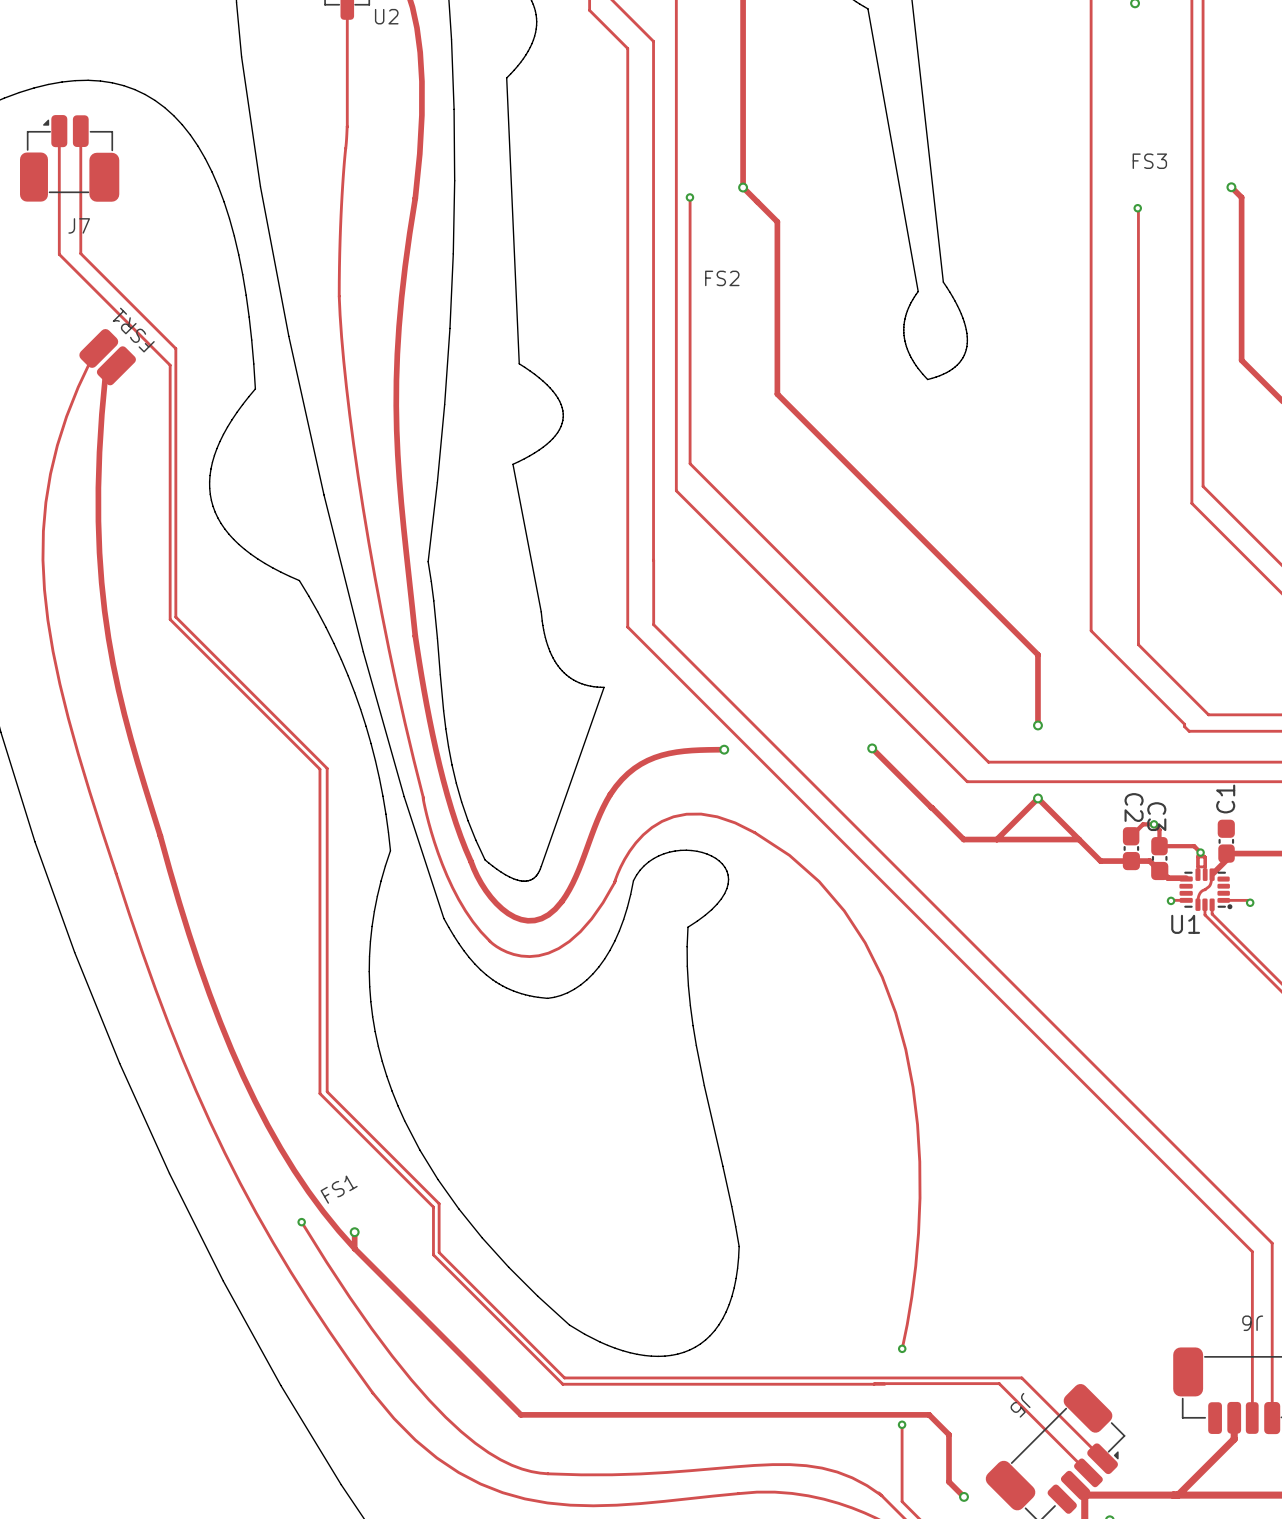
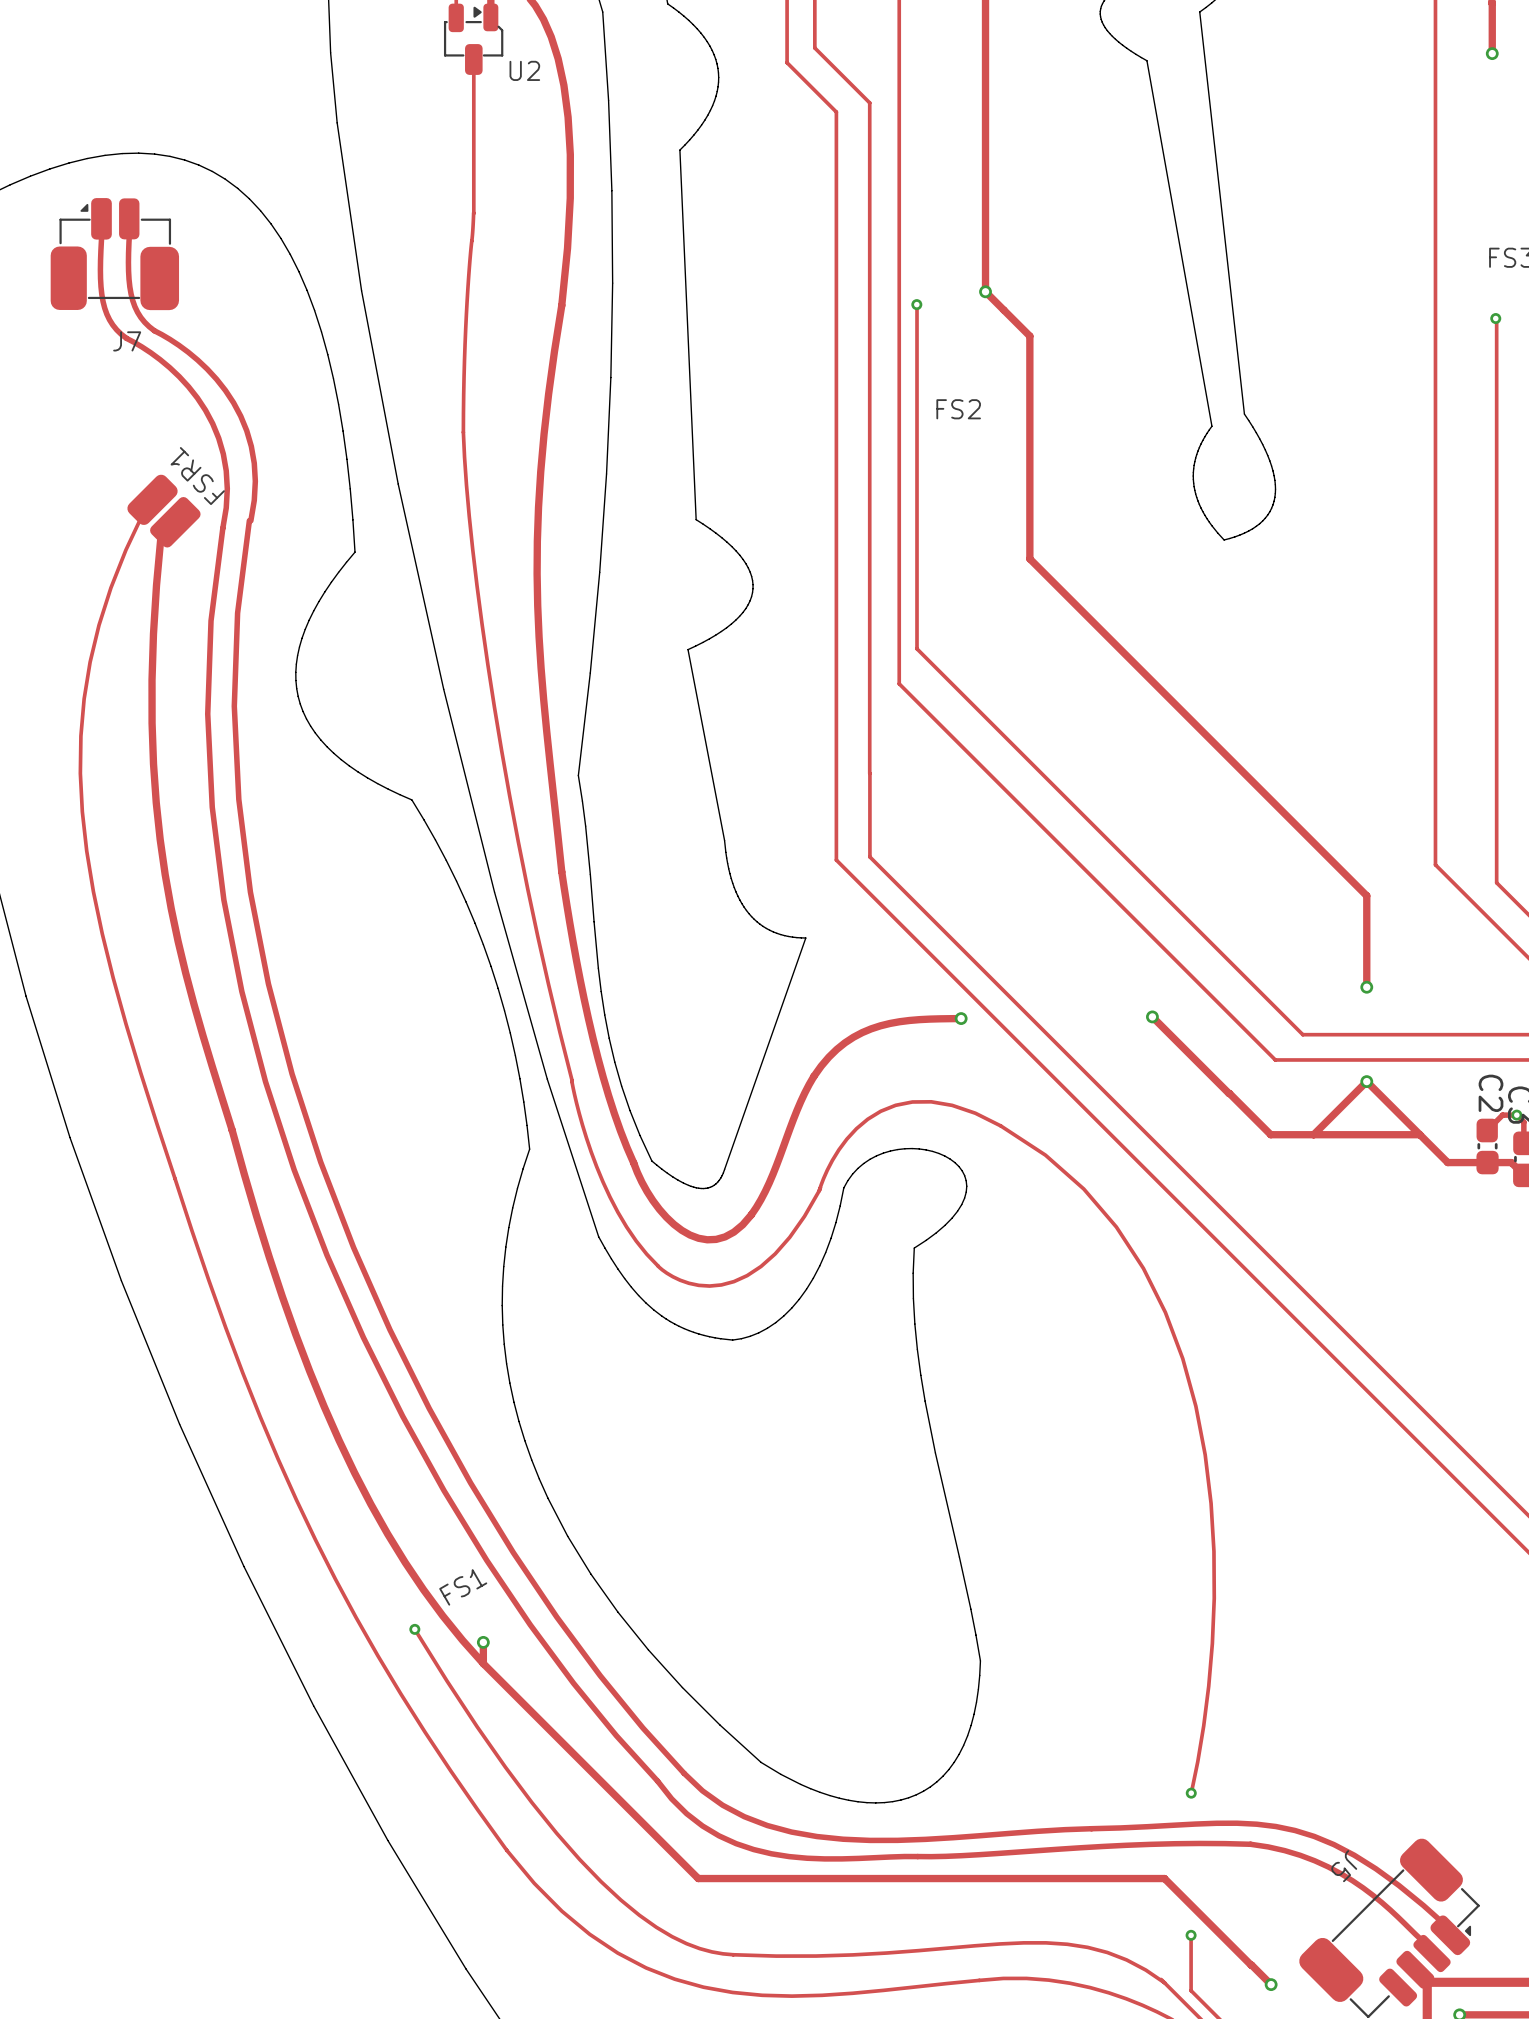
track: none -> (131, 208) (128, 271) (131, 294) (134, 306) (149, 326) (178, 345) (207, 369) (233, 402) (246, 430) (254, 463) (254, 500) (250, 520)
track: none -> (103, 216) (101, 286) (104, 308) (109, 319) (121, 334) (160, 359) (188, 386) (212, 423) (223, 453) (227, 488) (226, 507) (211, 620) (207, 713) (212, 807) (223, 899) (241, 991) (265, 1081) (294, 1169) (327, 1255) (363, 1337) (402, 1416) (444, 1490) (486, 1560) (530, 1624) (573, 1683) (616, 1735) (686, 1813) (719, 1835) (753, 1849) (789, 1856) (841, 1858) (961, 1855) (1150, 1844) (1250, 1844) (1300, 1855) (1340, 1873) (1382, 1902) (1419, 1938)
track: (59, 131) (59, 254) (170, 365) (170, 619) (319, 769) (319, 1093) (433, 1207) (433, 1254) (562, 1384) (884, 1384) -> none
track: (80, 131) (80, 253) (175, 348) (175, 617) (327, 768) (327, 1091) (439, 1203) (439, 1252) (564, 1377) (1021, 1377) (1102, 1458) -> none
track: none -> (249, 520) (237, 613) (234, 706) (238, 799) (250, 892) (268, 983) (292, 1074) (320, 1162) (353, 1247) (389, 1329) (429, 1408) (470, 1482) (513, 1552) (556, 1617) (600, 1675) (642, 1727) (684, 1773) (702, 1790) (722, 1805) (744, 1816) (791, 1832) (843, 1839) (897, 1840) (1064, 1829) (1216, 1823) (1275, 1826) (1314, 1836) (1354, 1855) (1398, 1885) (1450, 1929)
track: (874, 1384) (999, 1383) (1088, 1472) -> none
track: (881, 1414) (929, 1414) (948, 1434) (948, 1481) -> (1164, 1878) (1251, 1965)
via position: (902, 1424) -> (1191, 1935)
track: (902, 1428) (902, 1458) -> none

